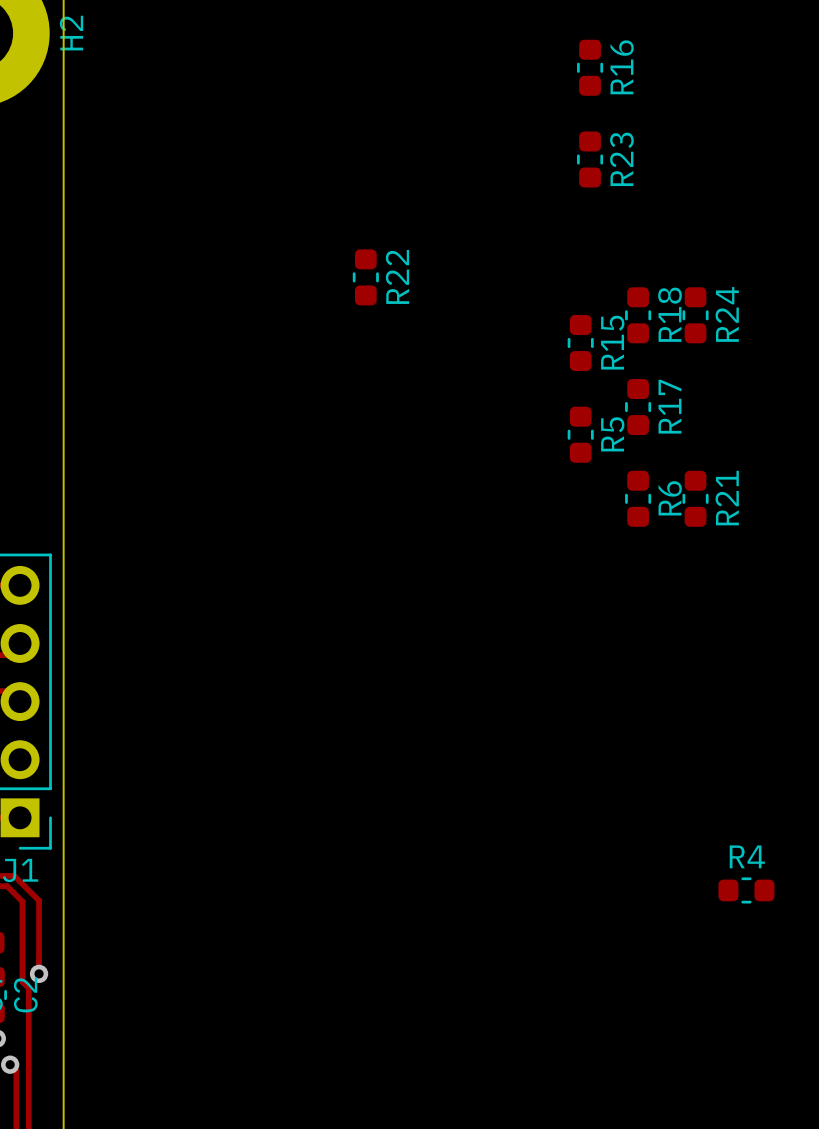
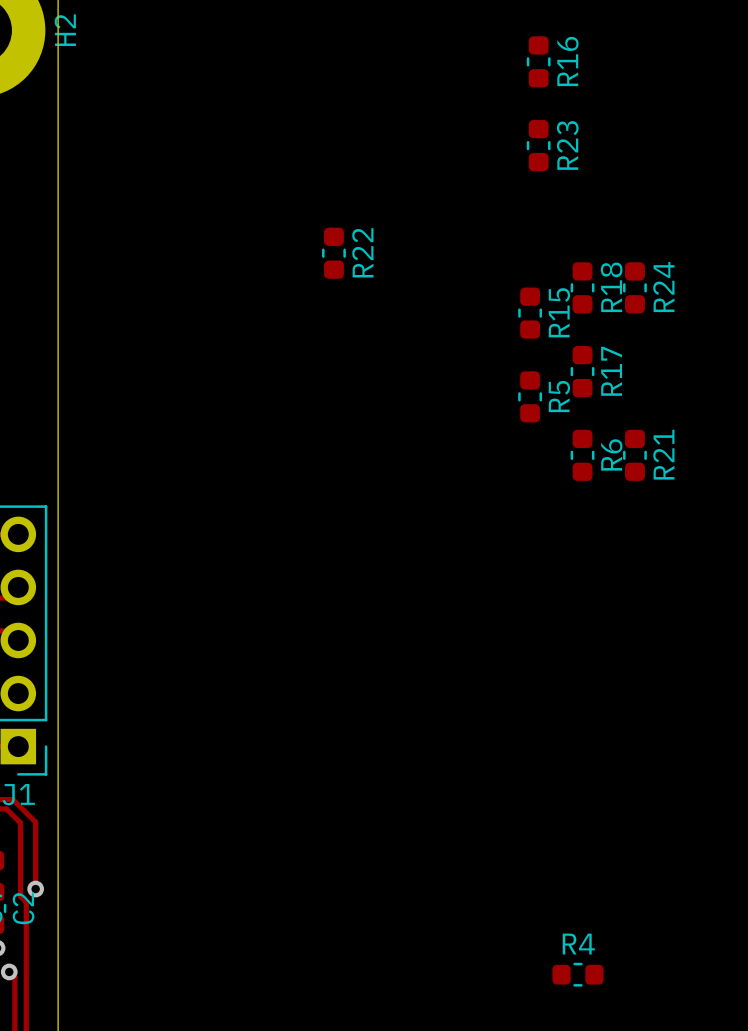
R4 position: (746, 890) -> (577, 974)

